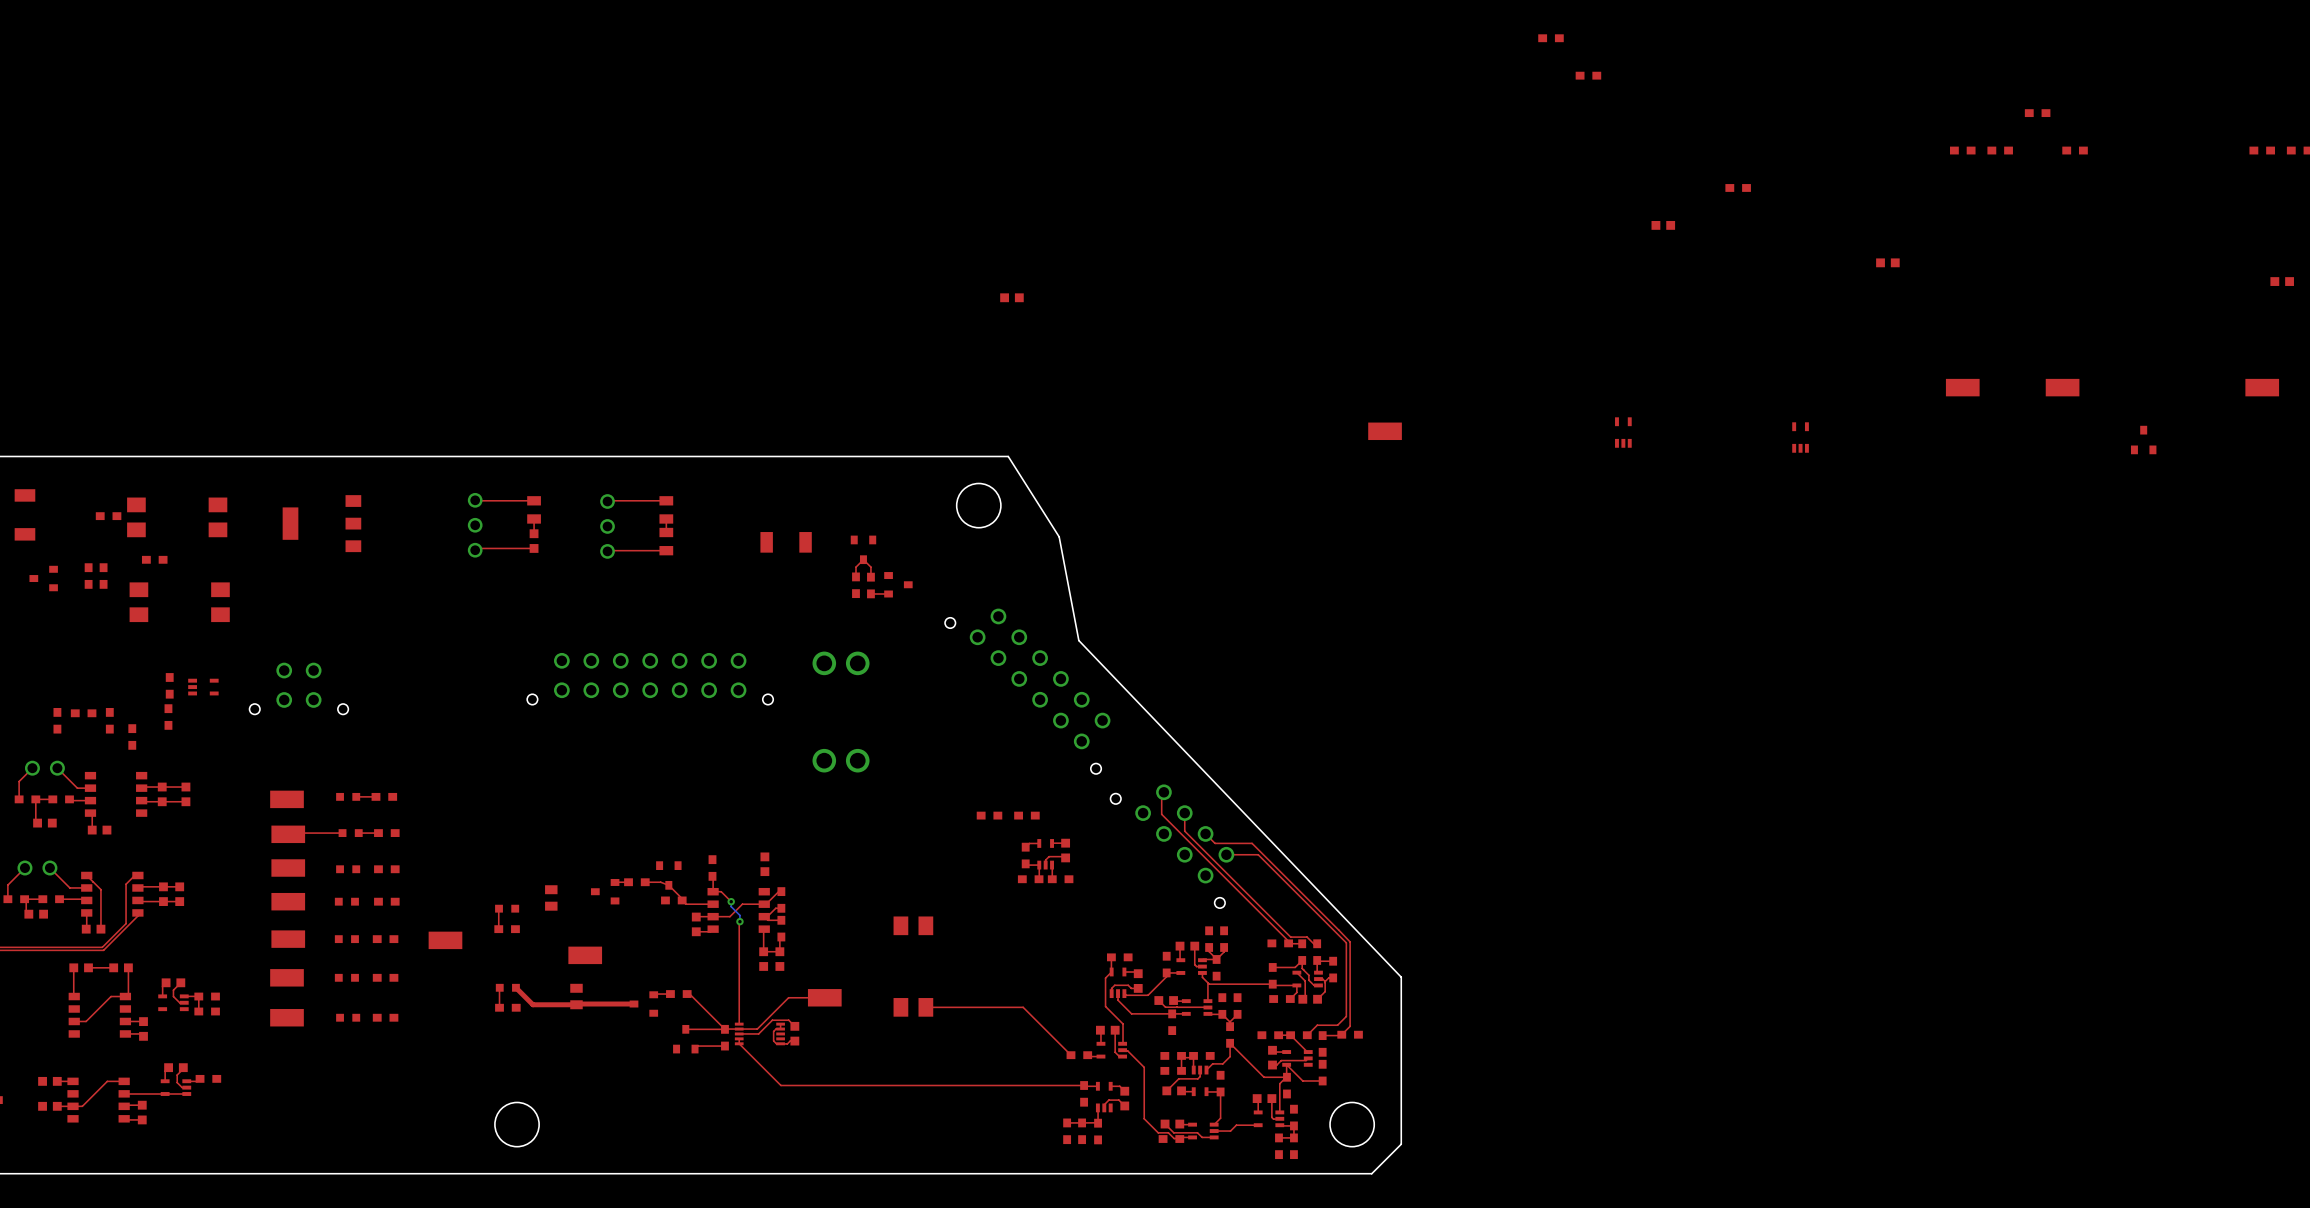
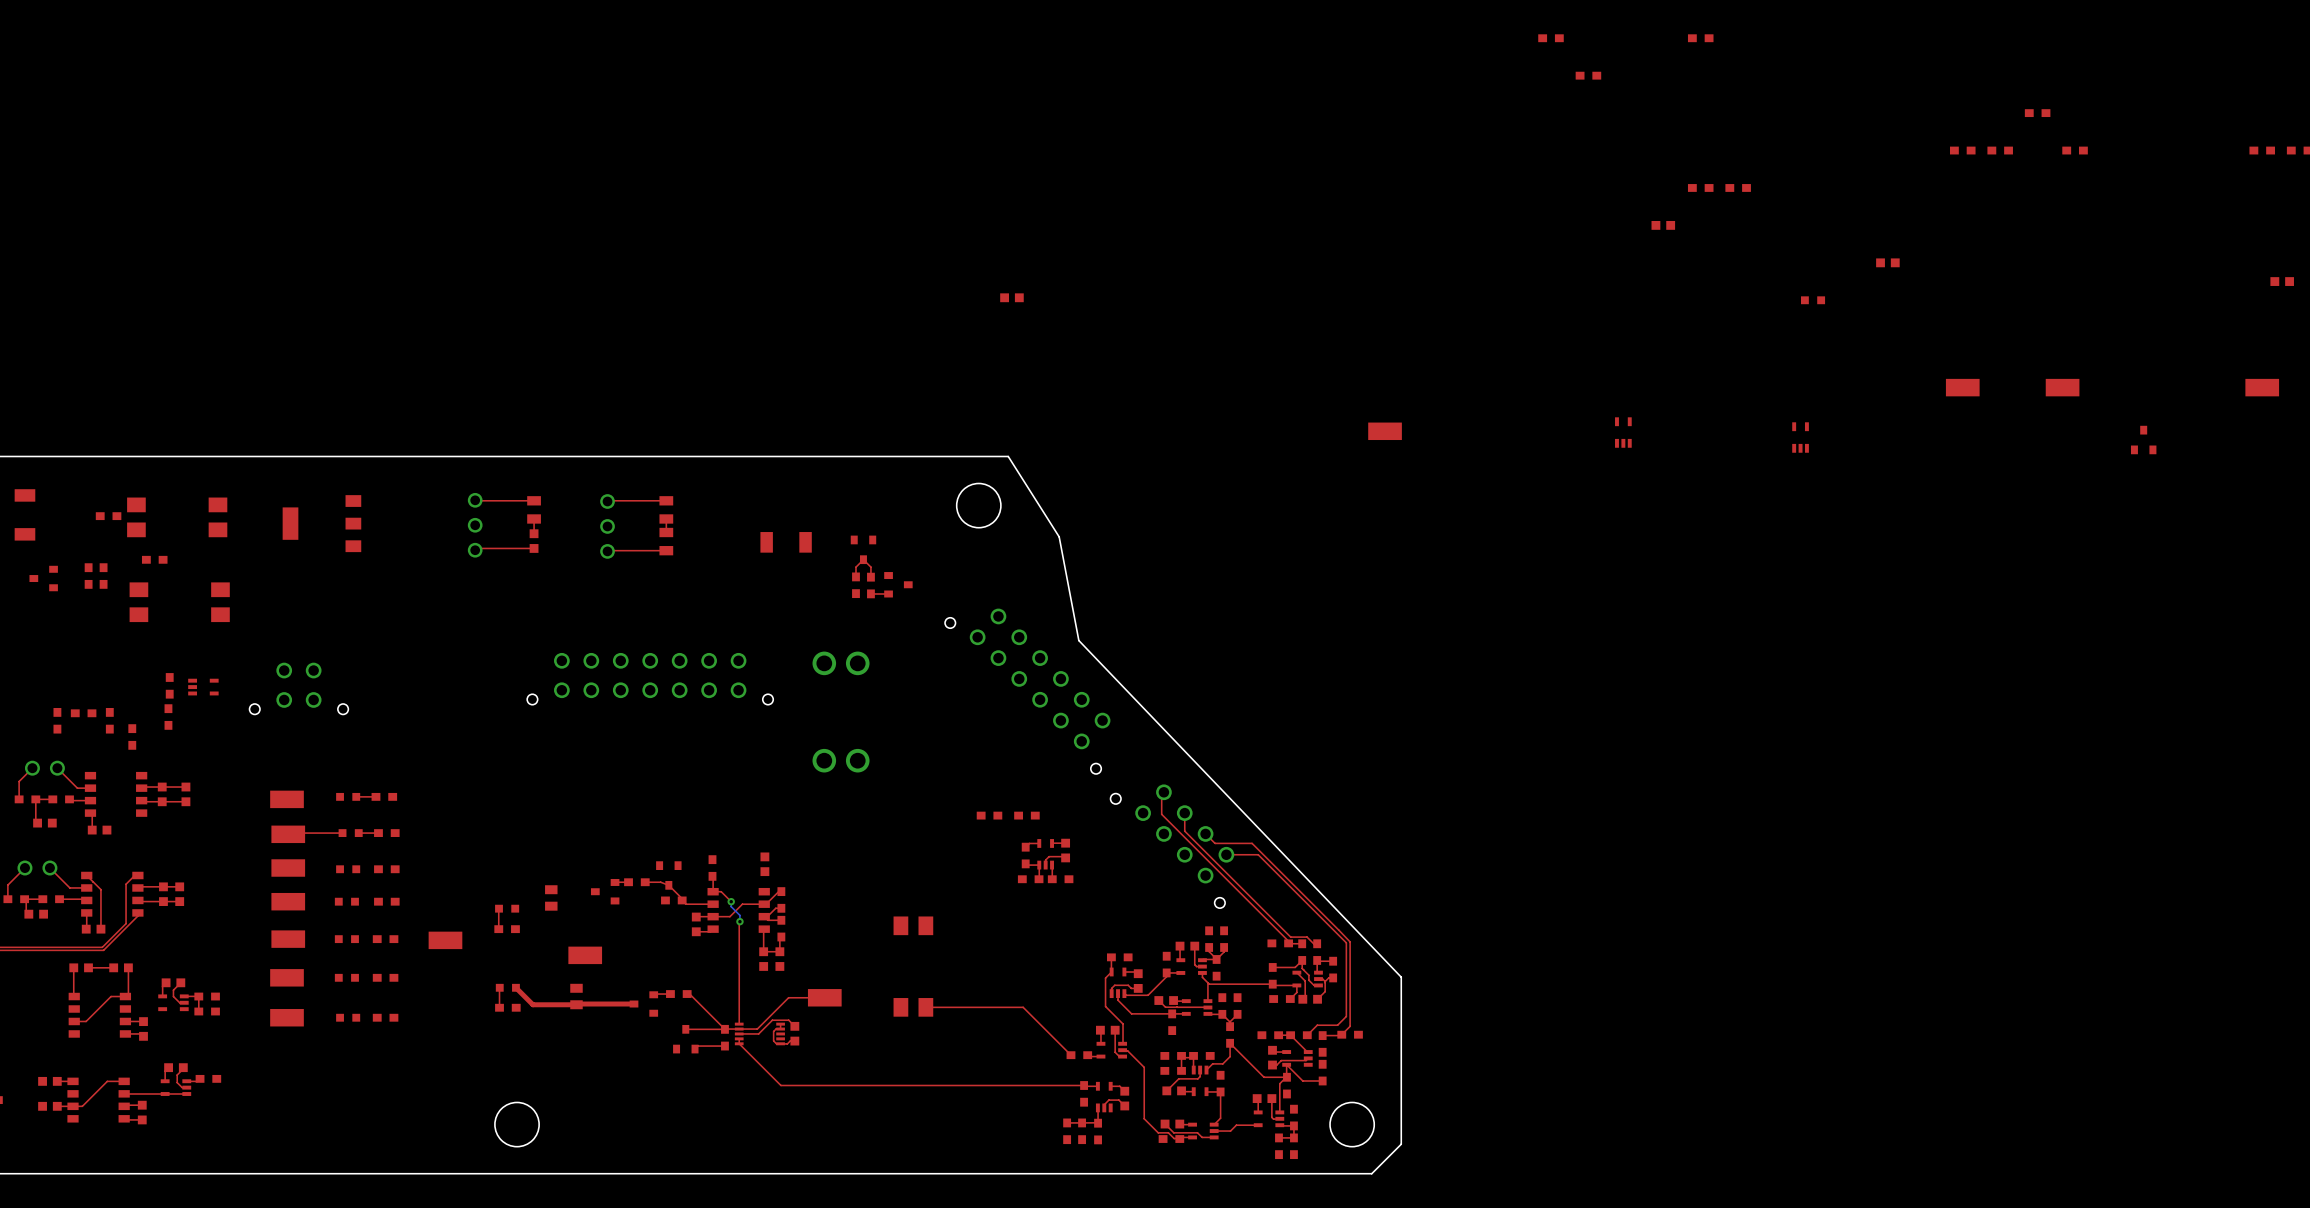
part: none -> (1700, 38)
part: none -> (1700, 187)
part: none -> (1813, 300)

